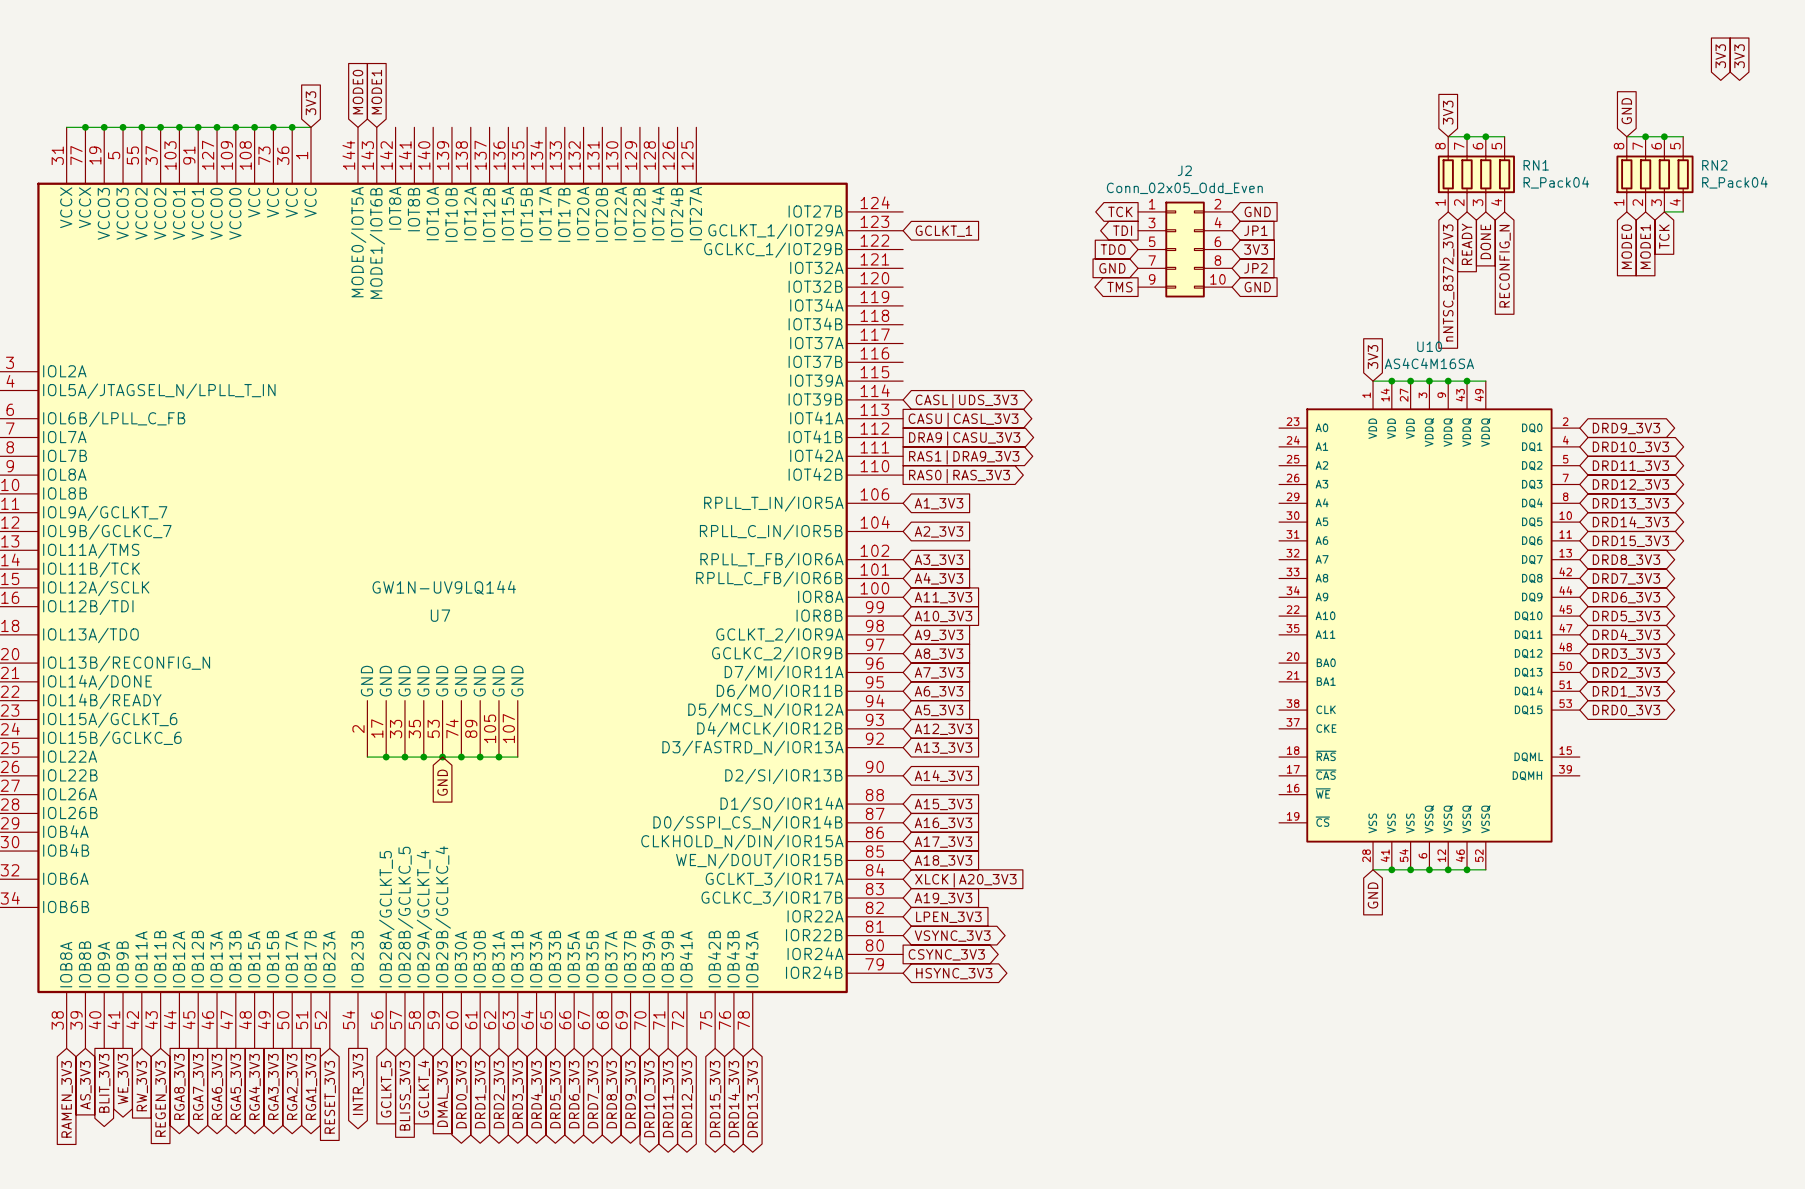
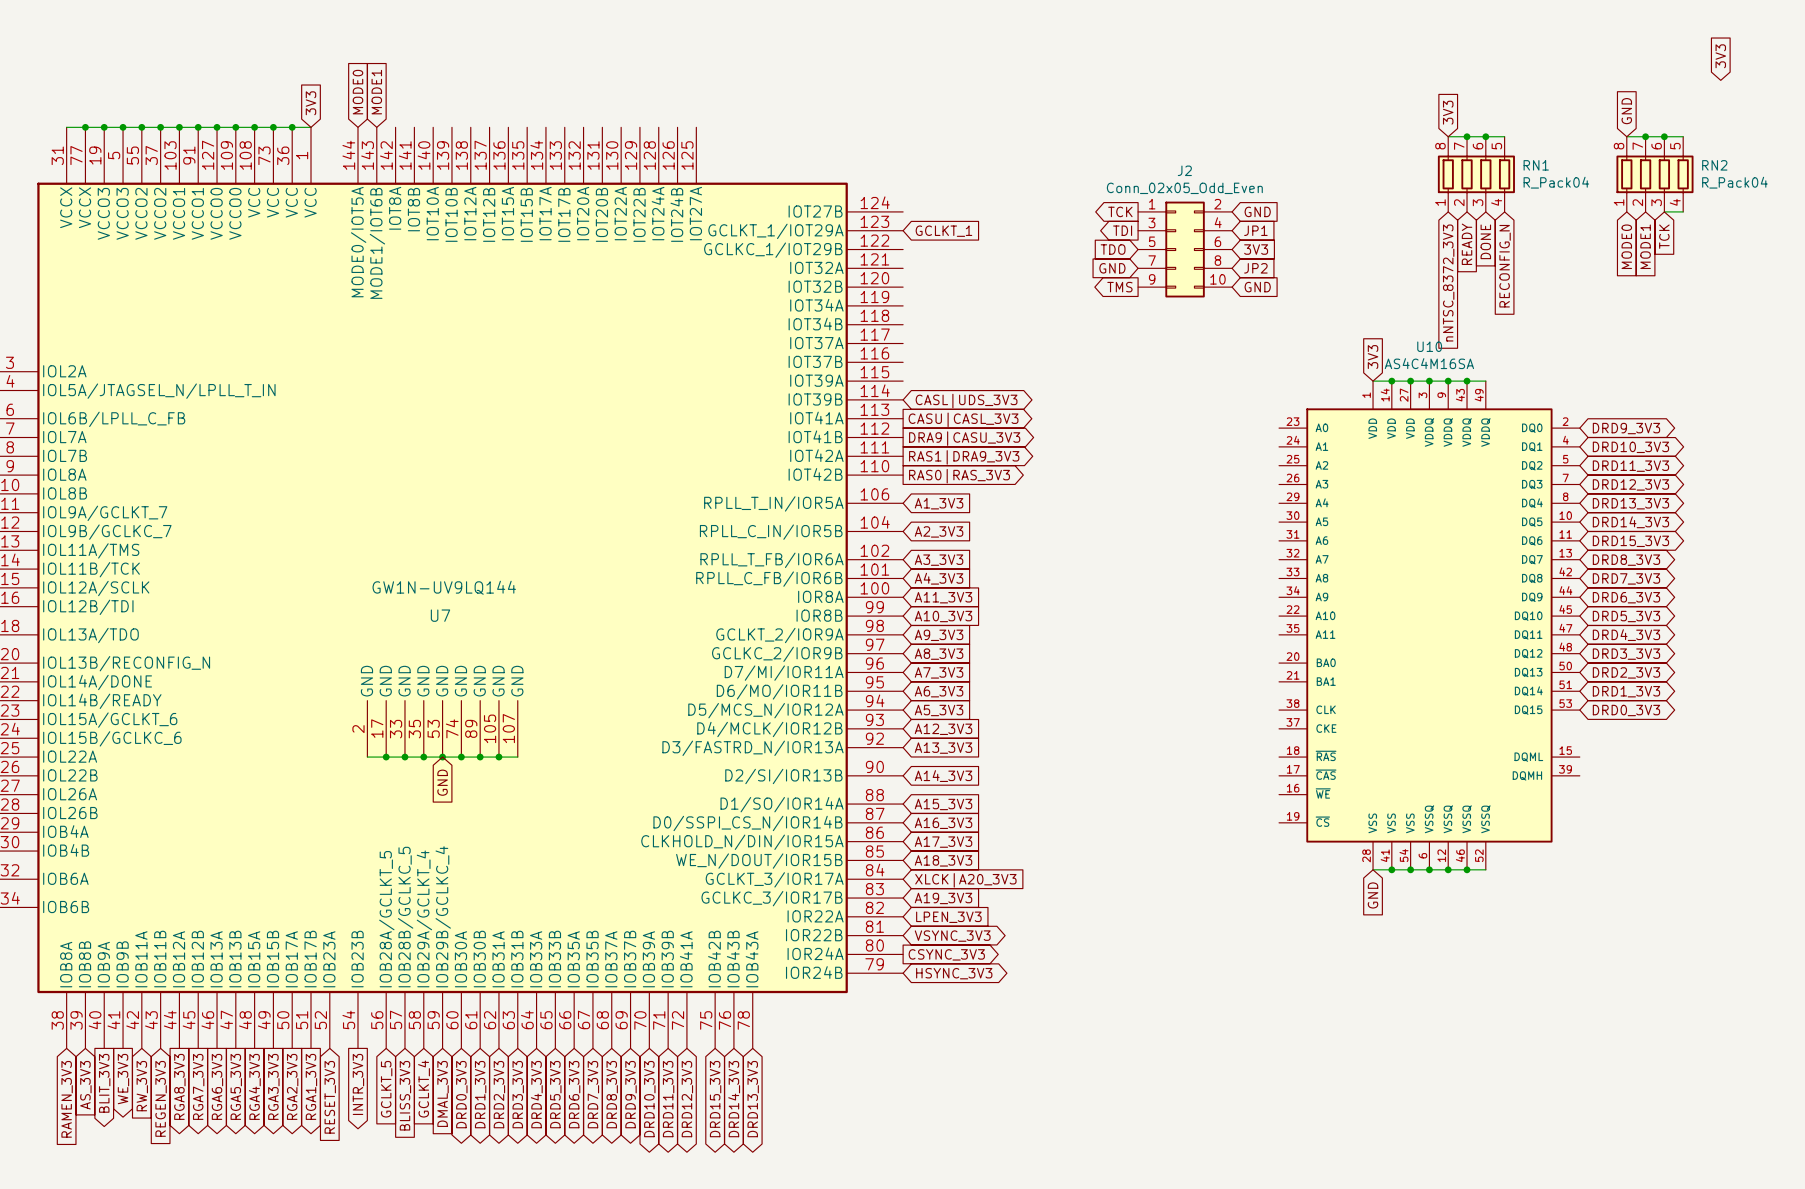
global label: 3V3 (1739, 56) -> none

